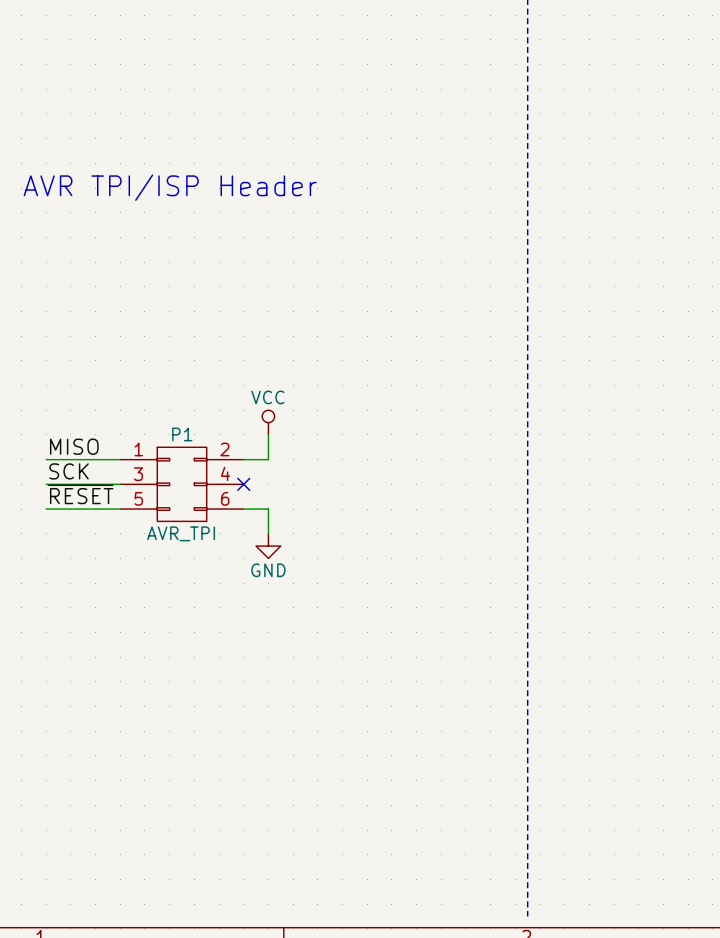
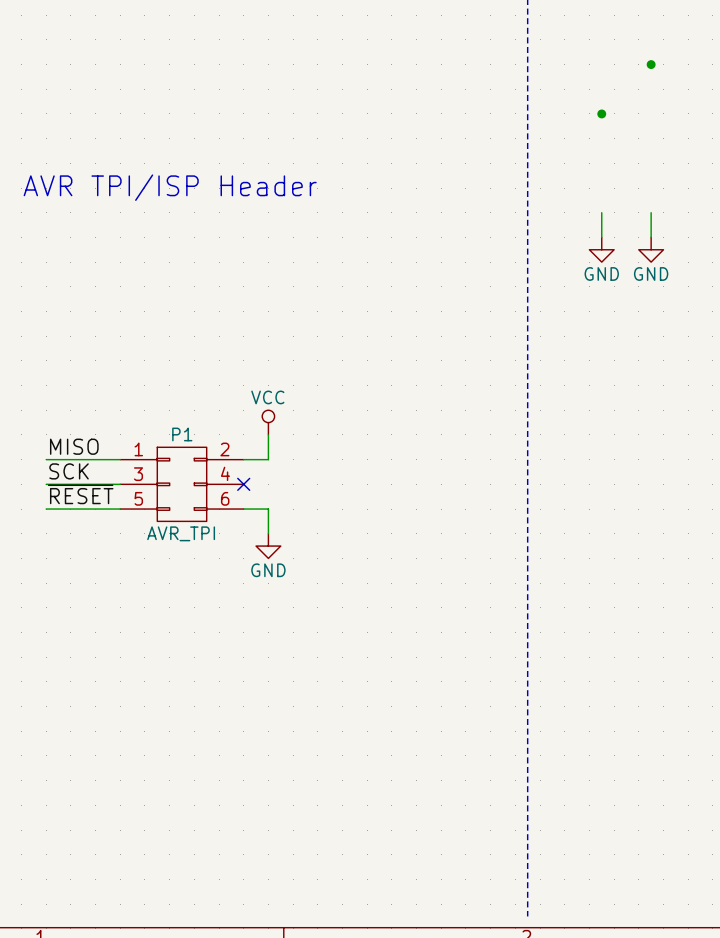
junction: none -> (651, 64)
junction: none -> (601, 113)
wire: none -> (601, 212) (601, 237)
wire: none -> (651, 212) (651, 237)
power symbol: none -> GND (601, 249)
power symbol: none -> GND (651, 249)

